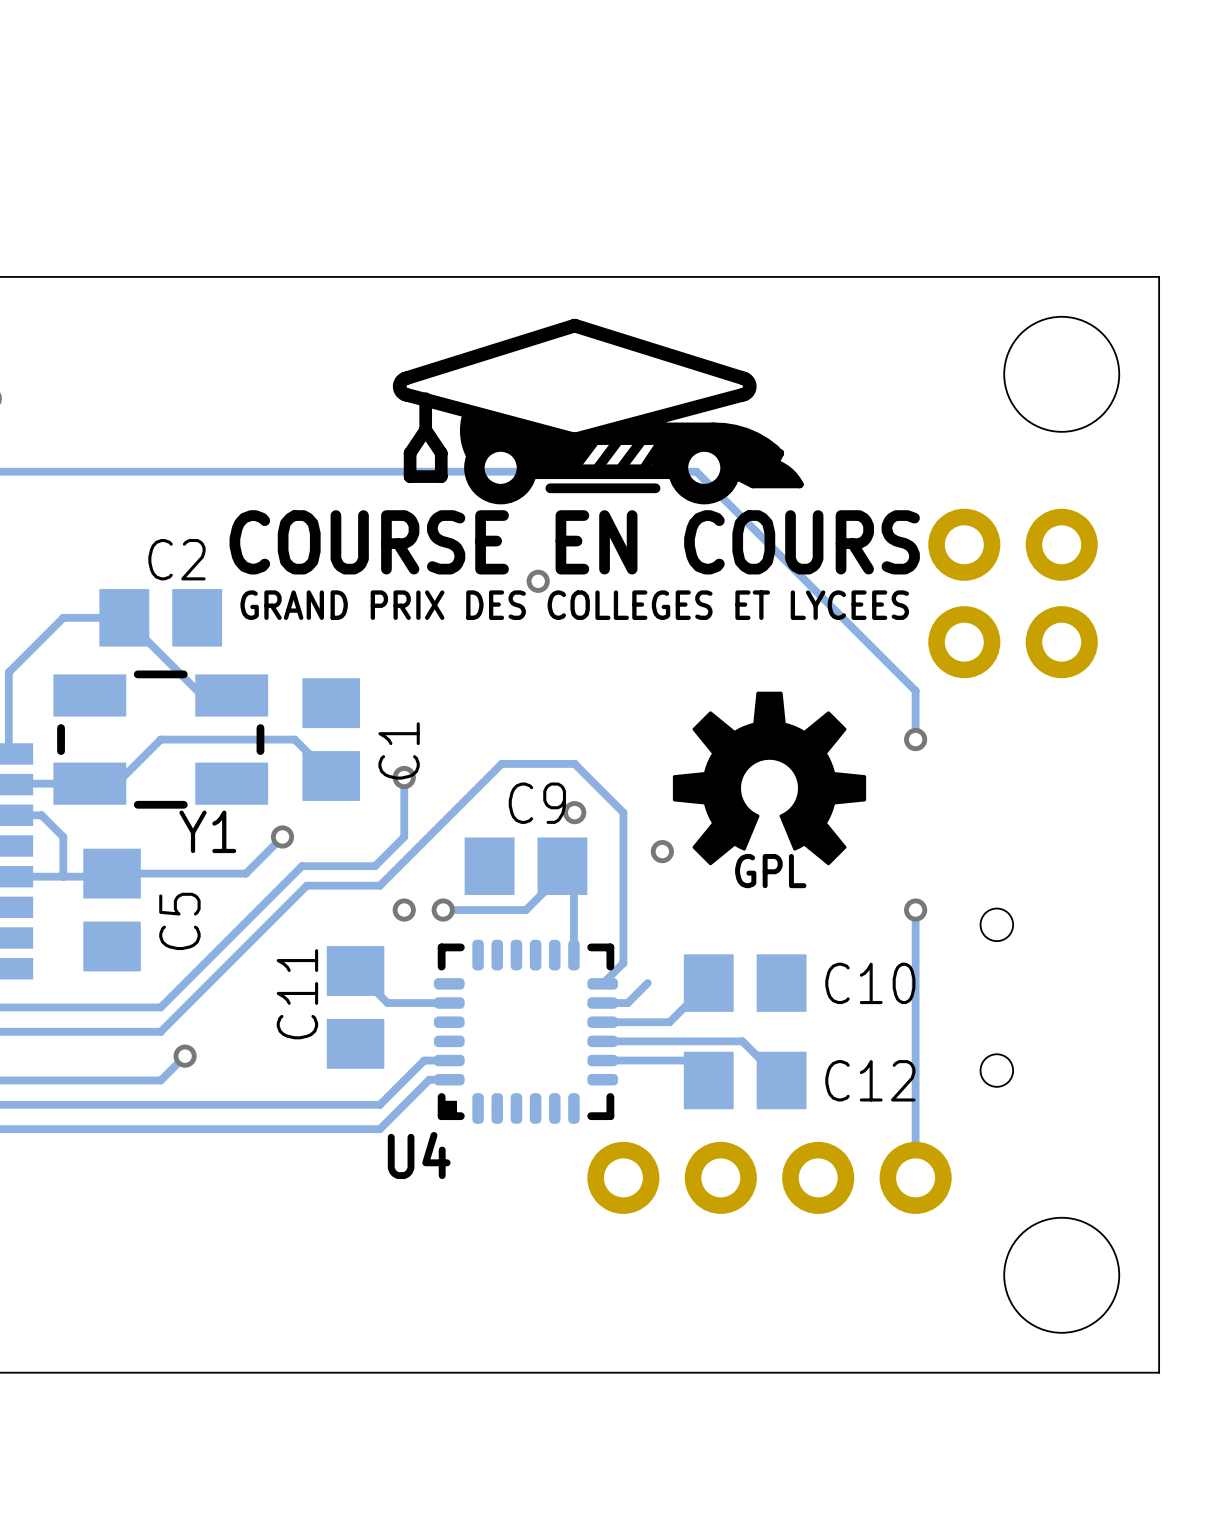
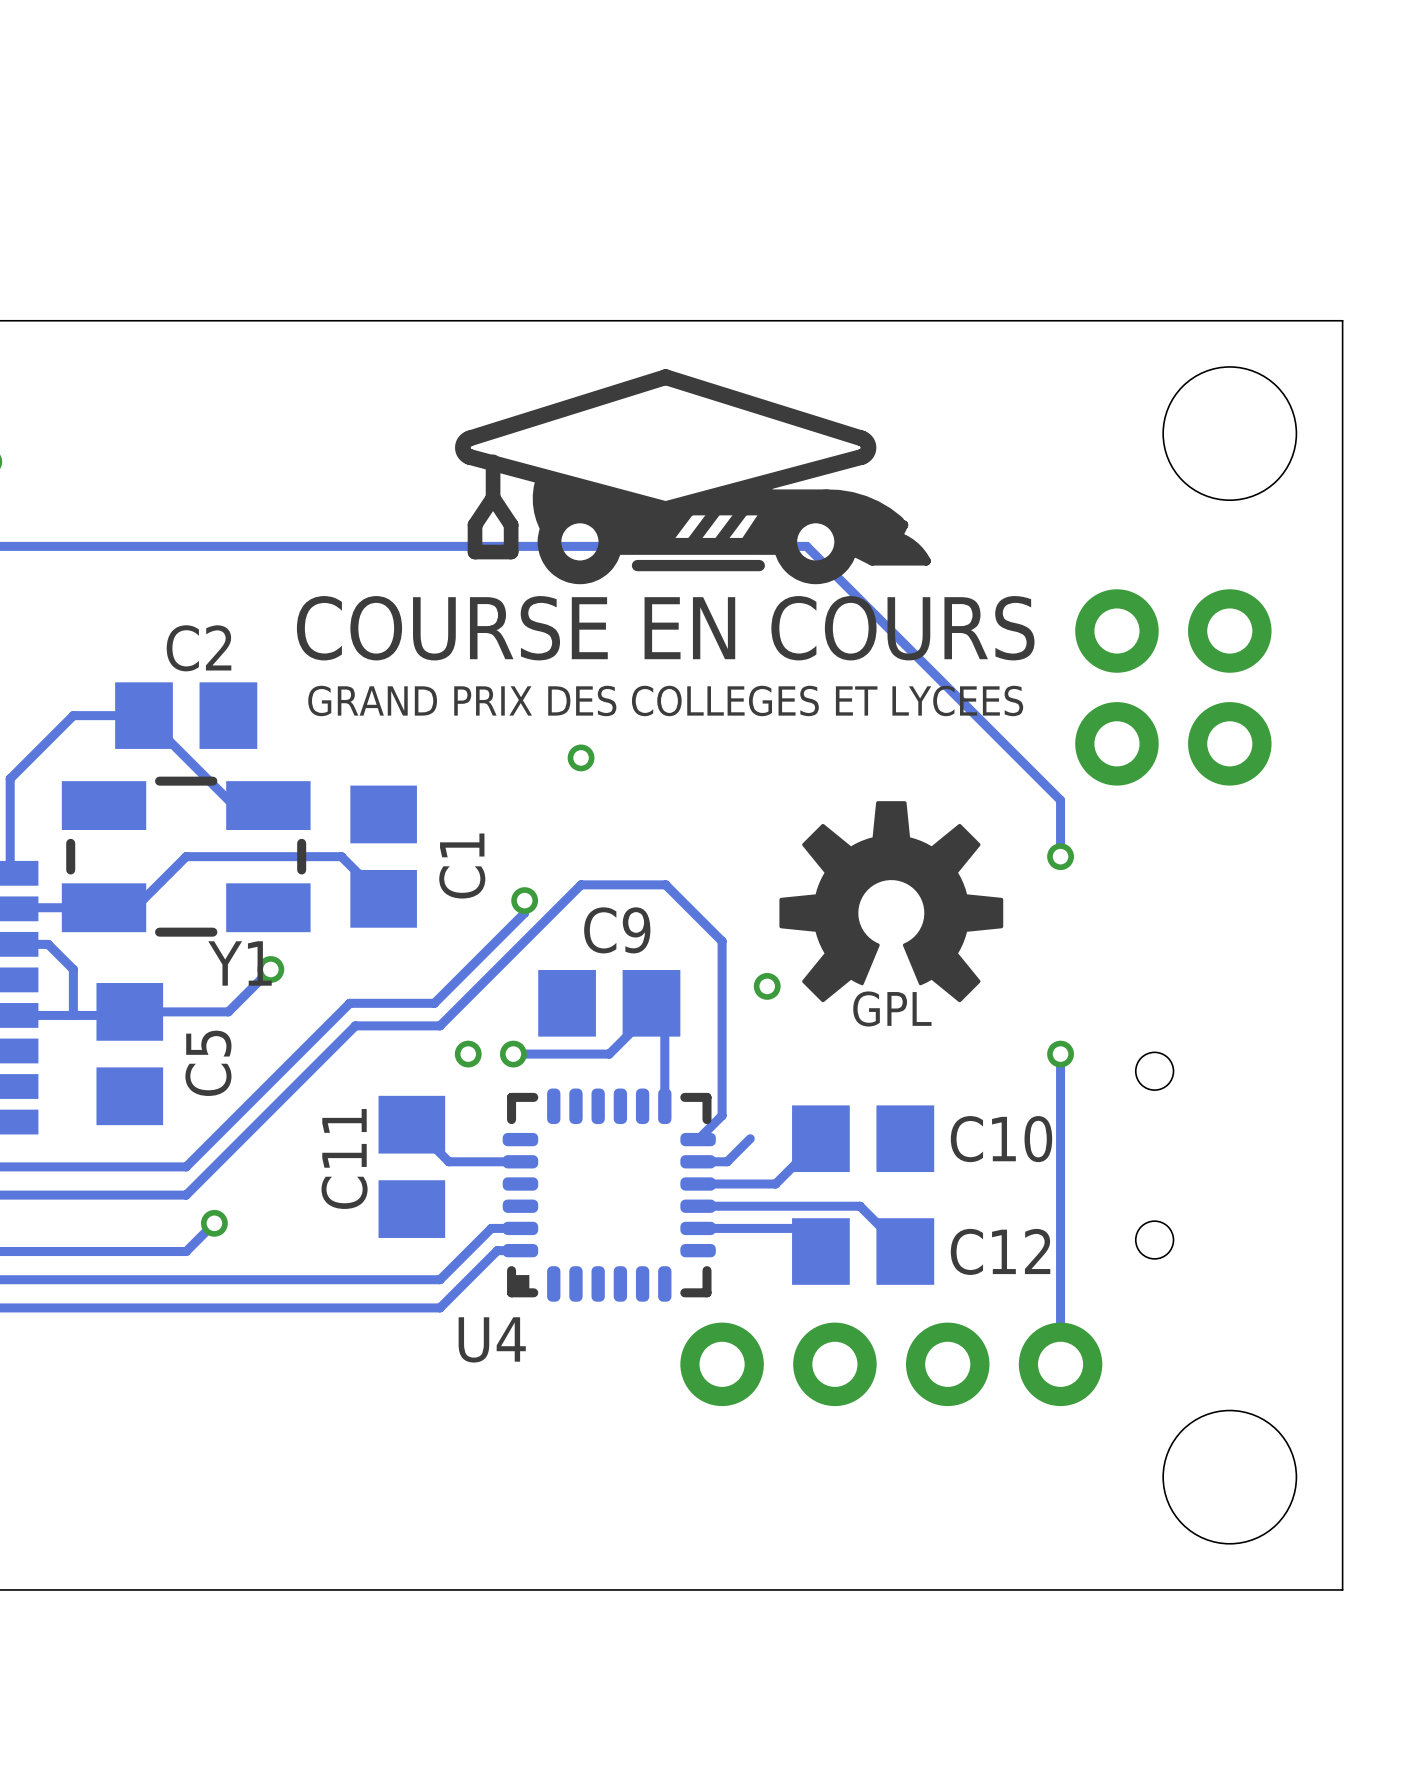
via: (538, 581) -> none
via: none -> (581, 757)
track: (404, 777) (404, 836) -> (524, 900) (524, 913) (468, 969)
via position: (404, 777) -> (524, 900)
via: (574, 812) -> none
track: (282, 836) (245, 873) (197, 873) -> (270, 969) (228, 1011)
via position: (282, 836) -> (270, 969)

